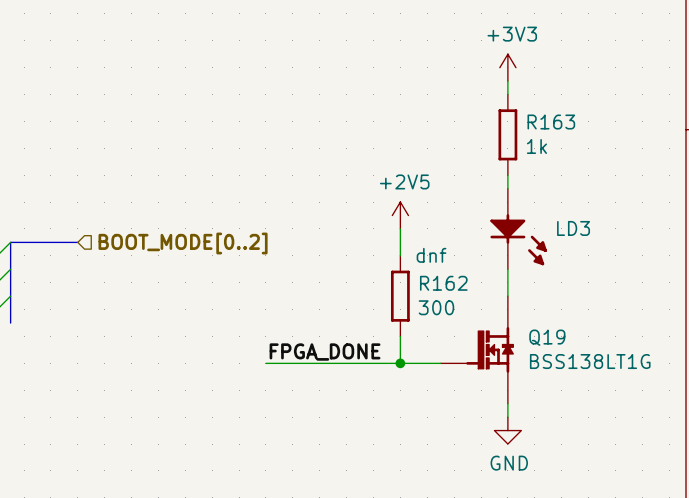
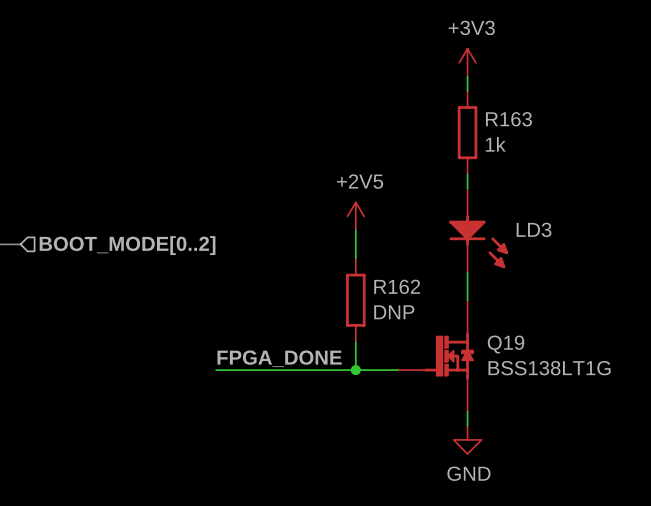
R162 text: dnf (431, 255) -> none
R162 text: 300 (436, 307) -> none
R162 text: none -> DNP (394, 312)

